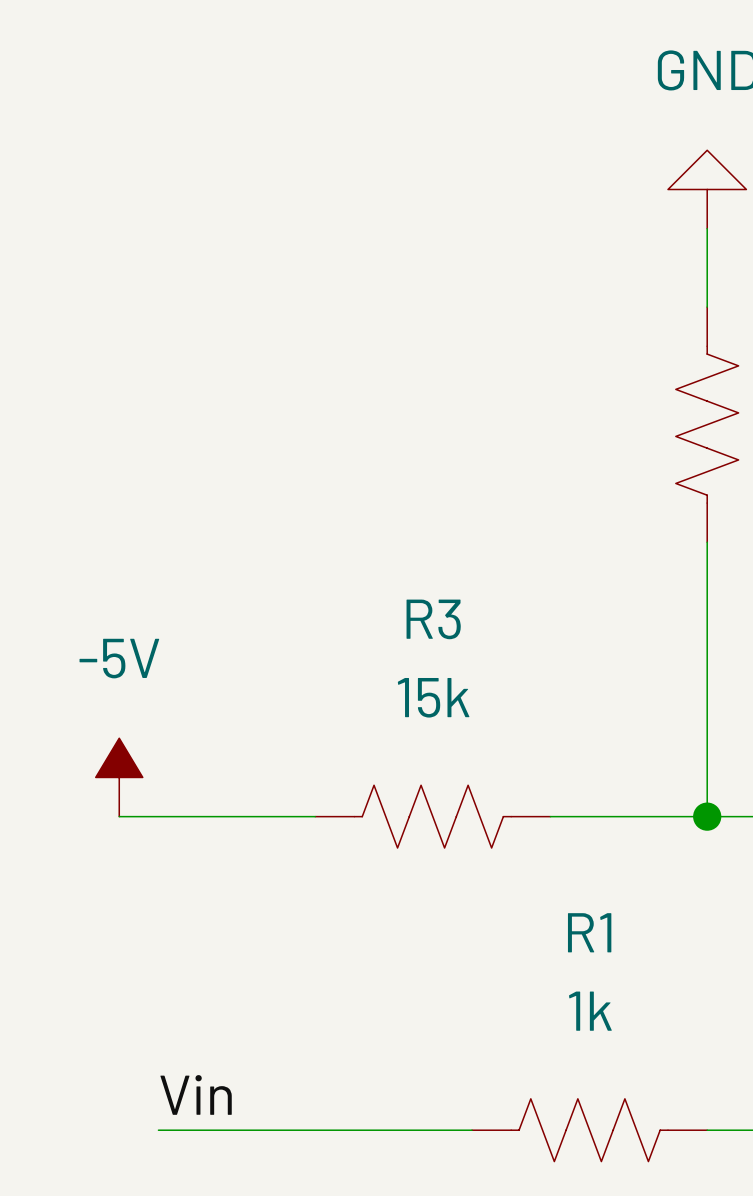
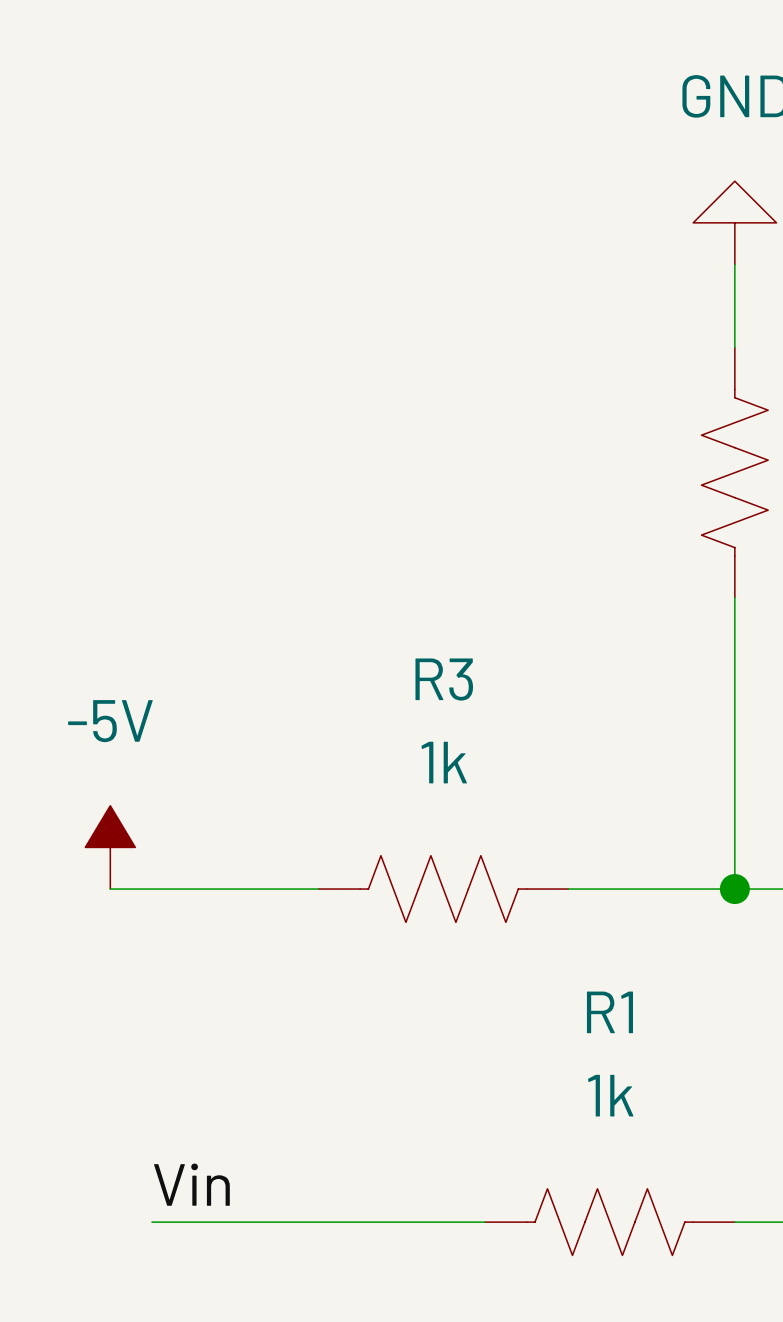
R3 value: 15k (433, 697) -> 1k (444, 762)

